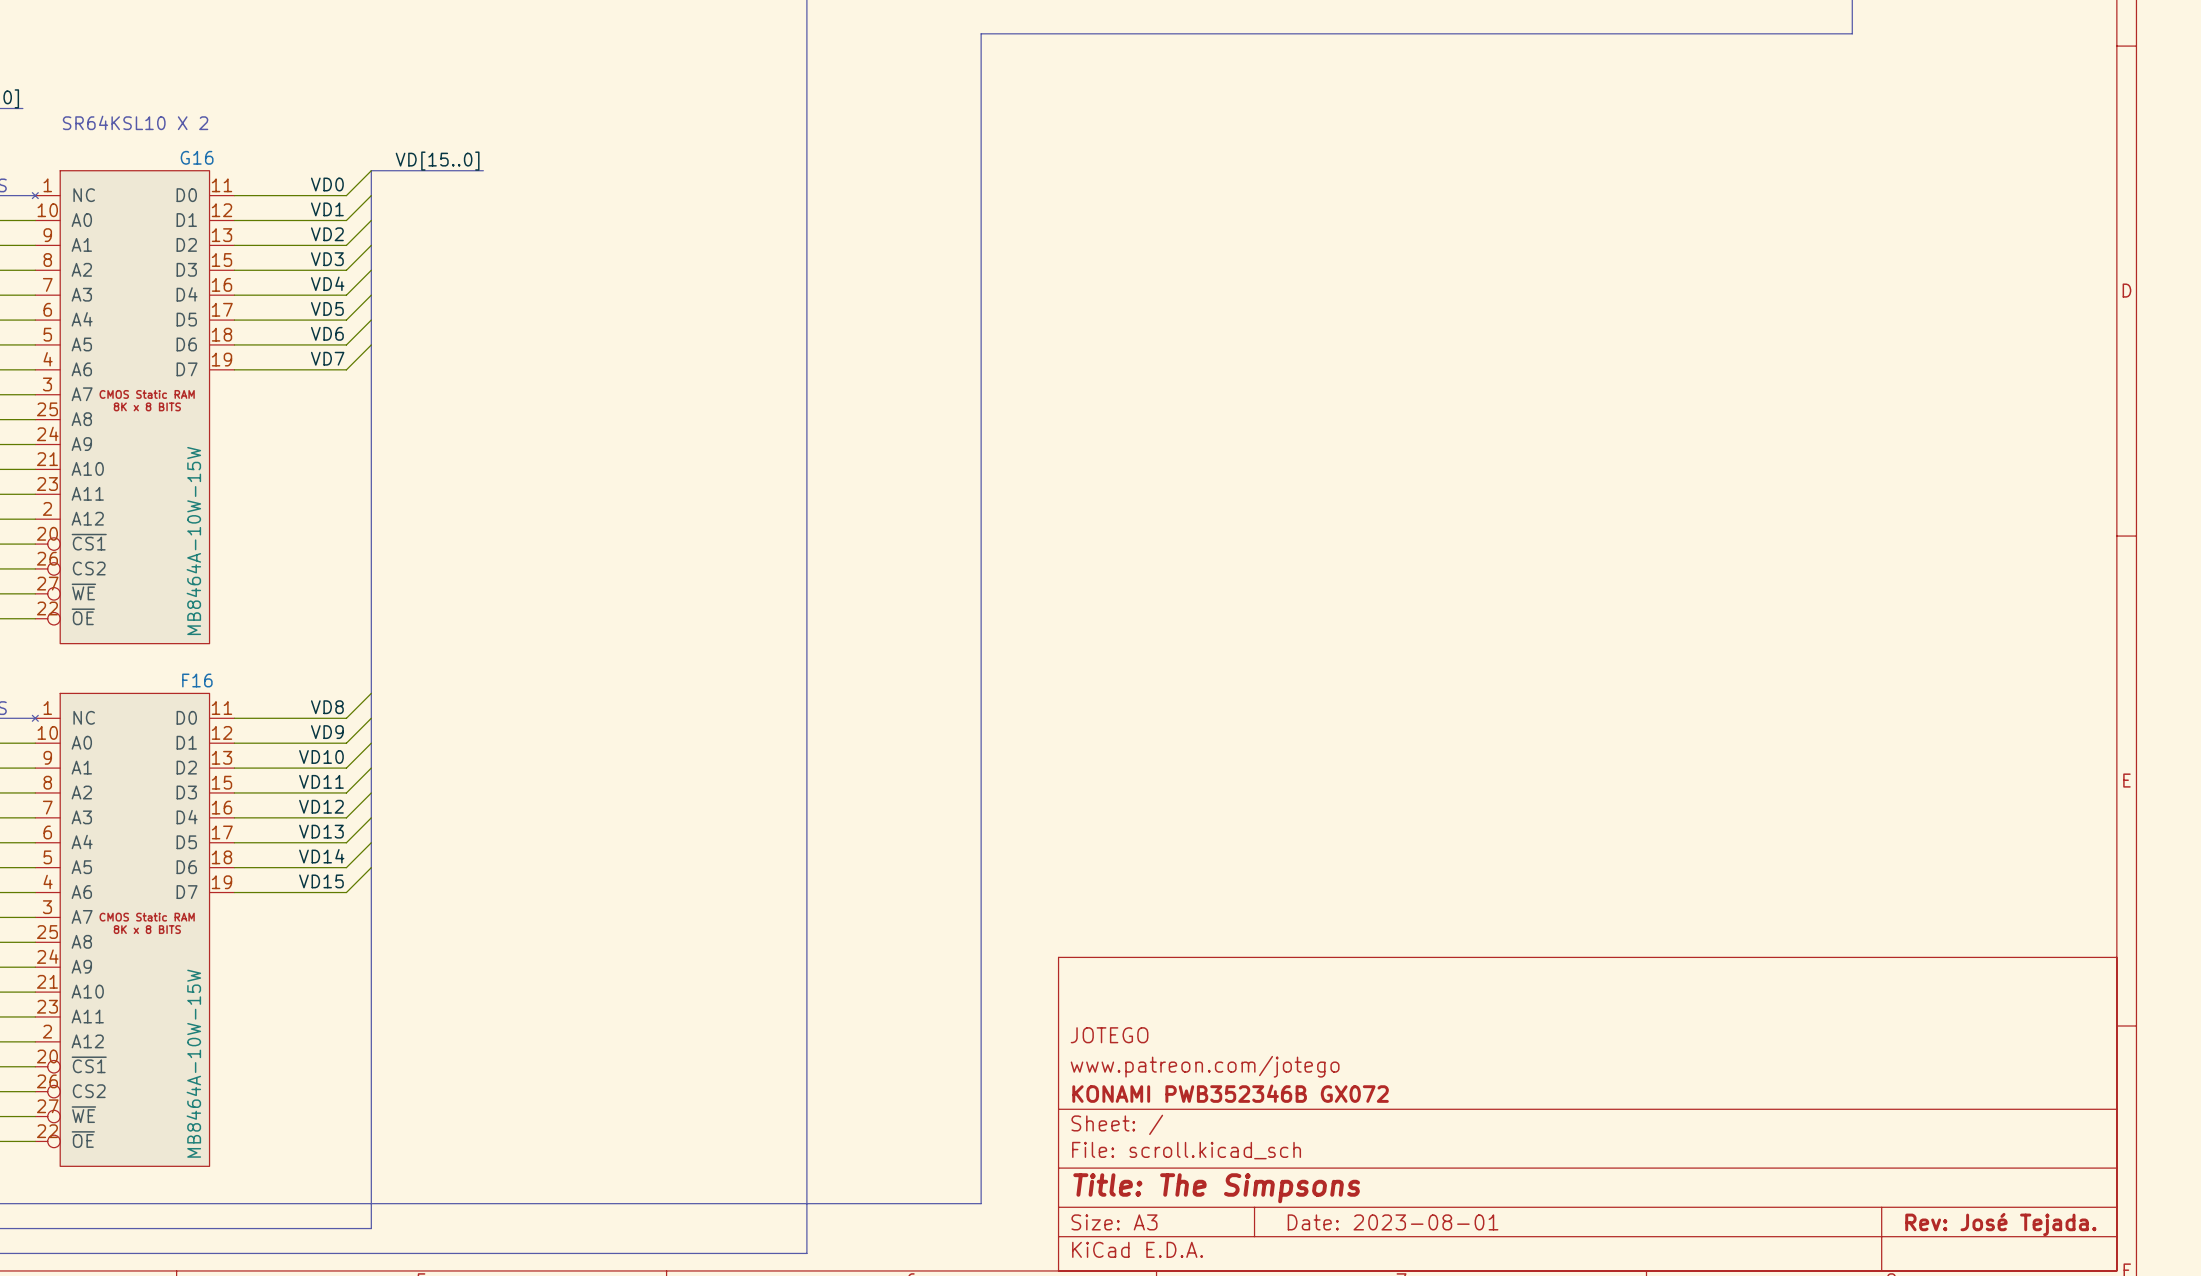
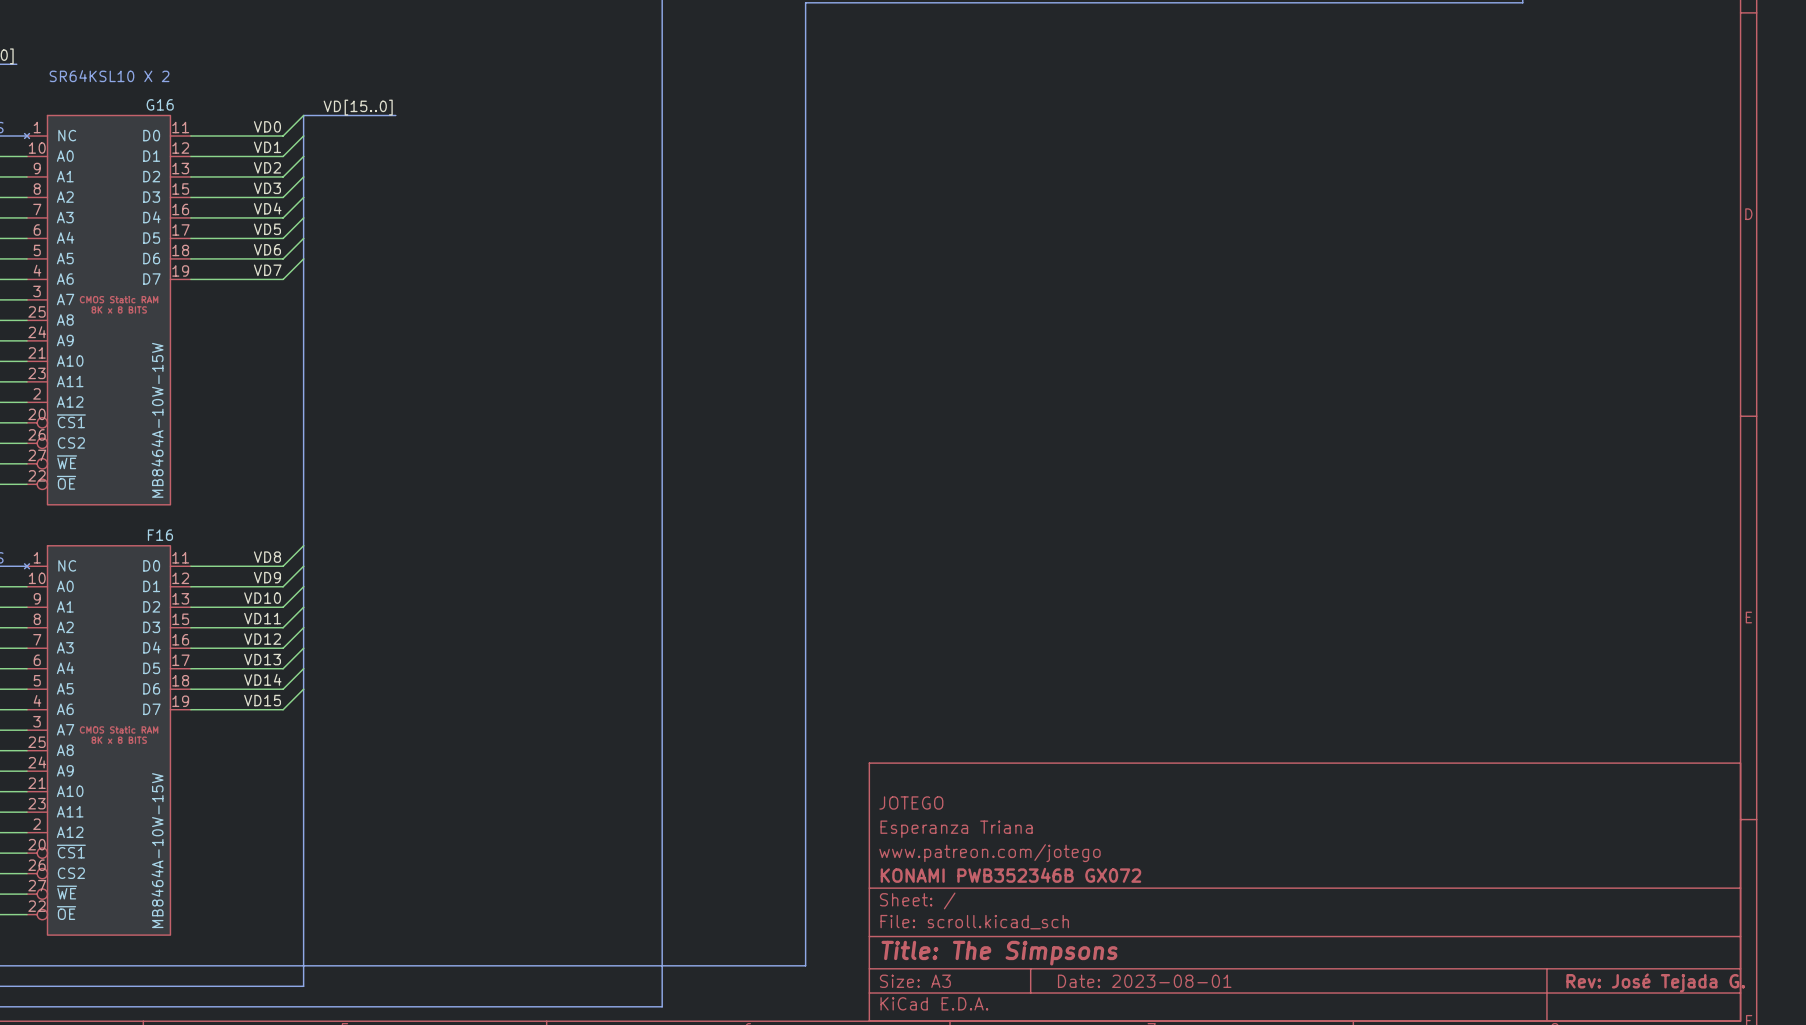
title block: none -> JOTEGO (911, 802)
title block: JOTEGO (1109, 1035) -> Esperanza Triana (956, 829)
title block: Rev: José Tejada. (2000, 1224) -> Rev: José Tejada G. (1655, 982)

